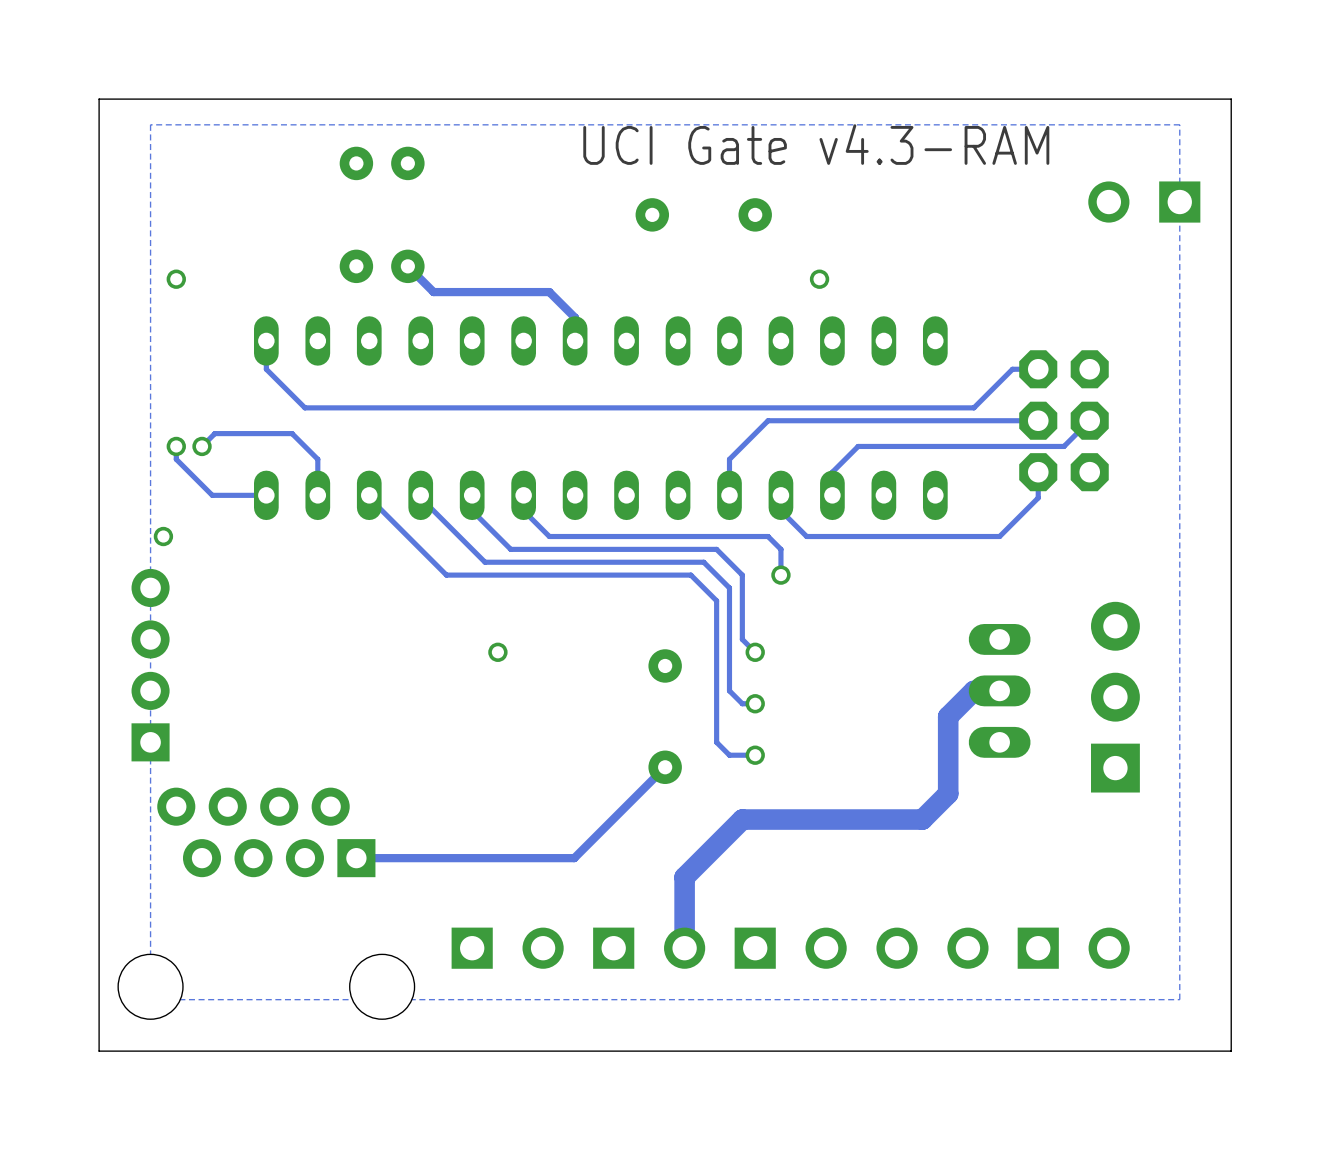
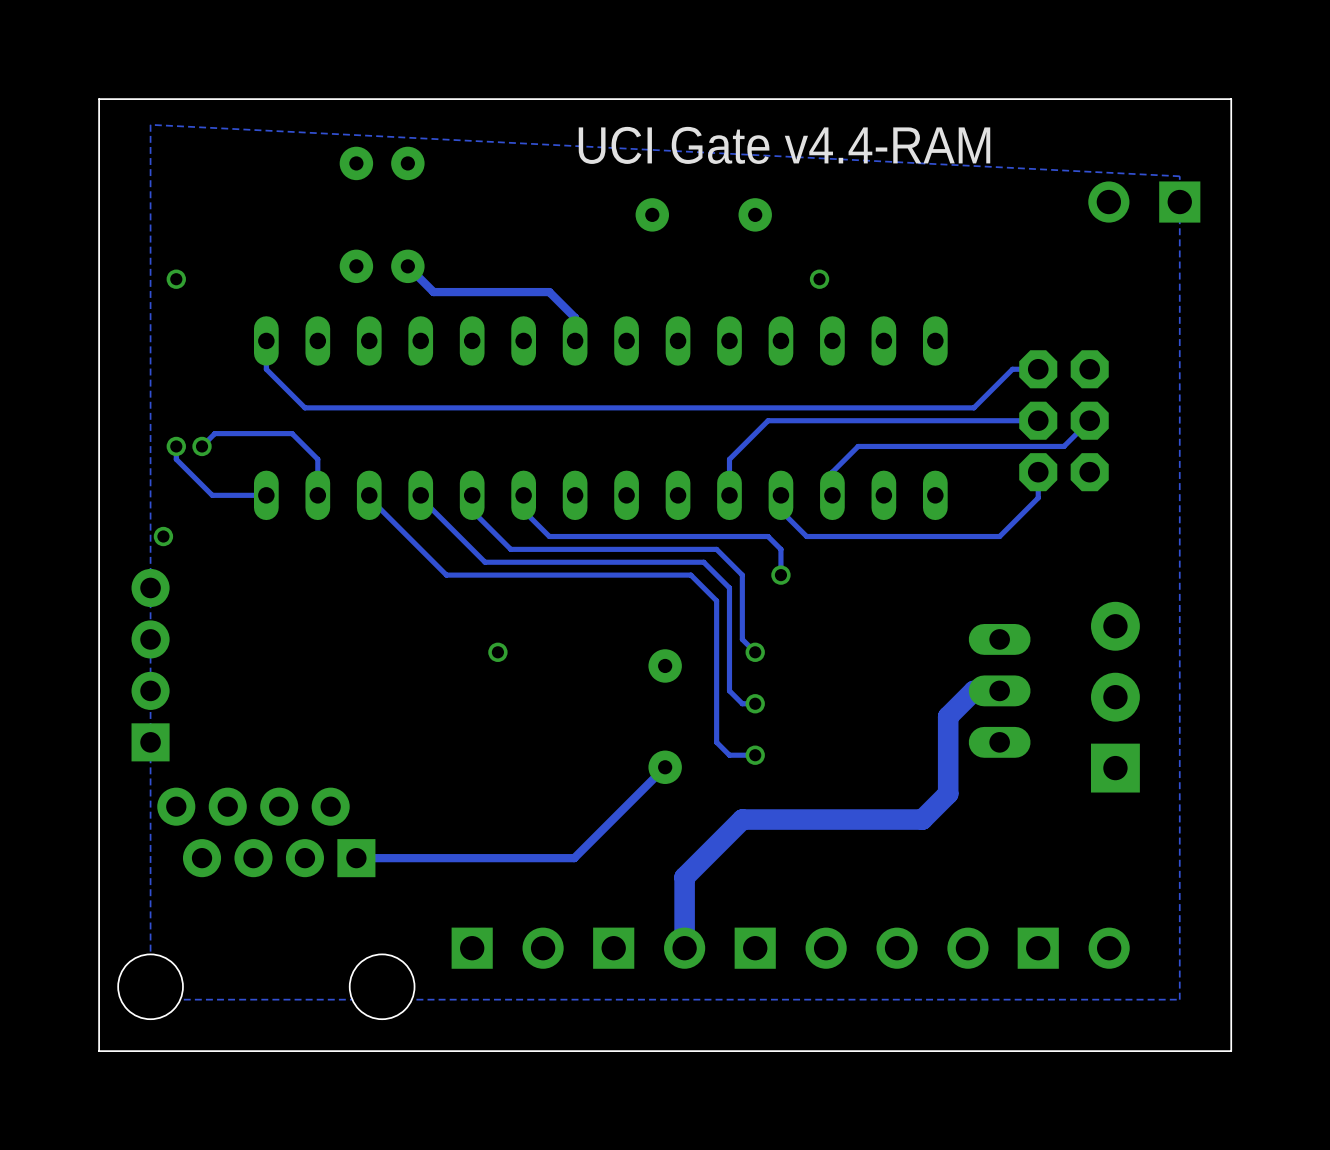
zone outline: (150, 124) (1179, 124) (1179, 176) -> (150, 124) (1179, 176)
text: UCI Gate v4.3-RAM (816, 144) -> UCI Gate v4.4-RAM (784, 145)

